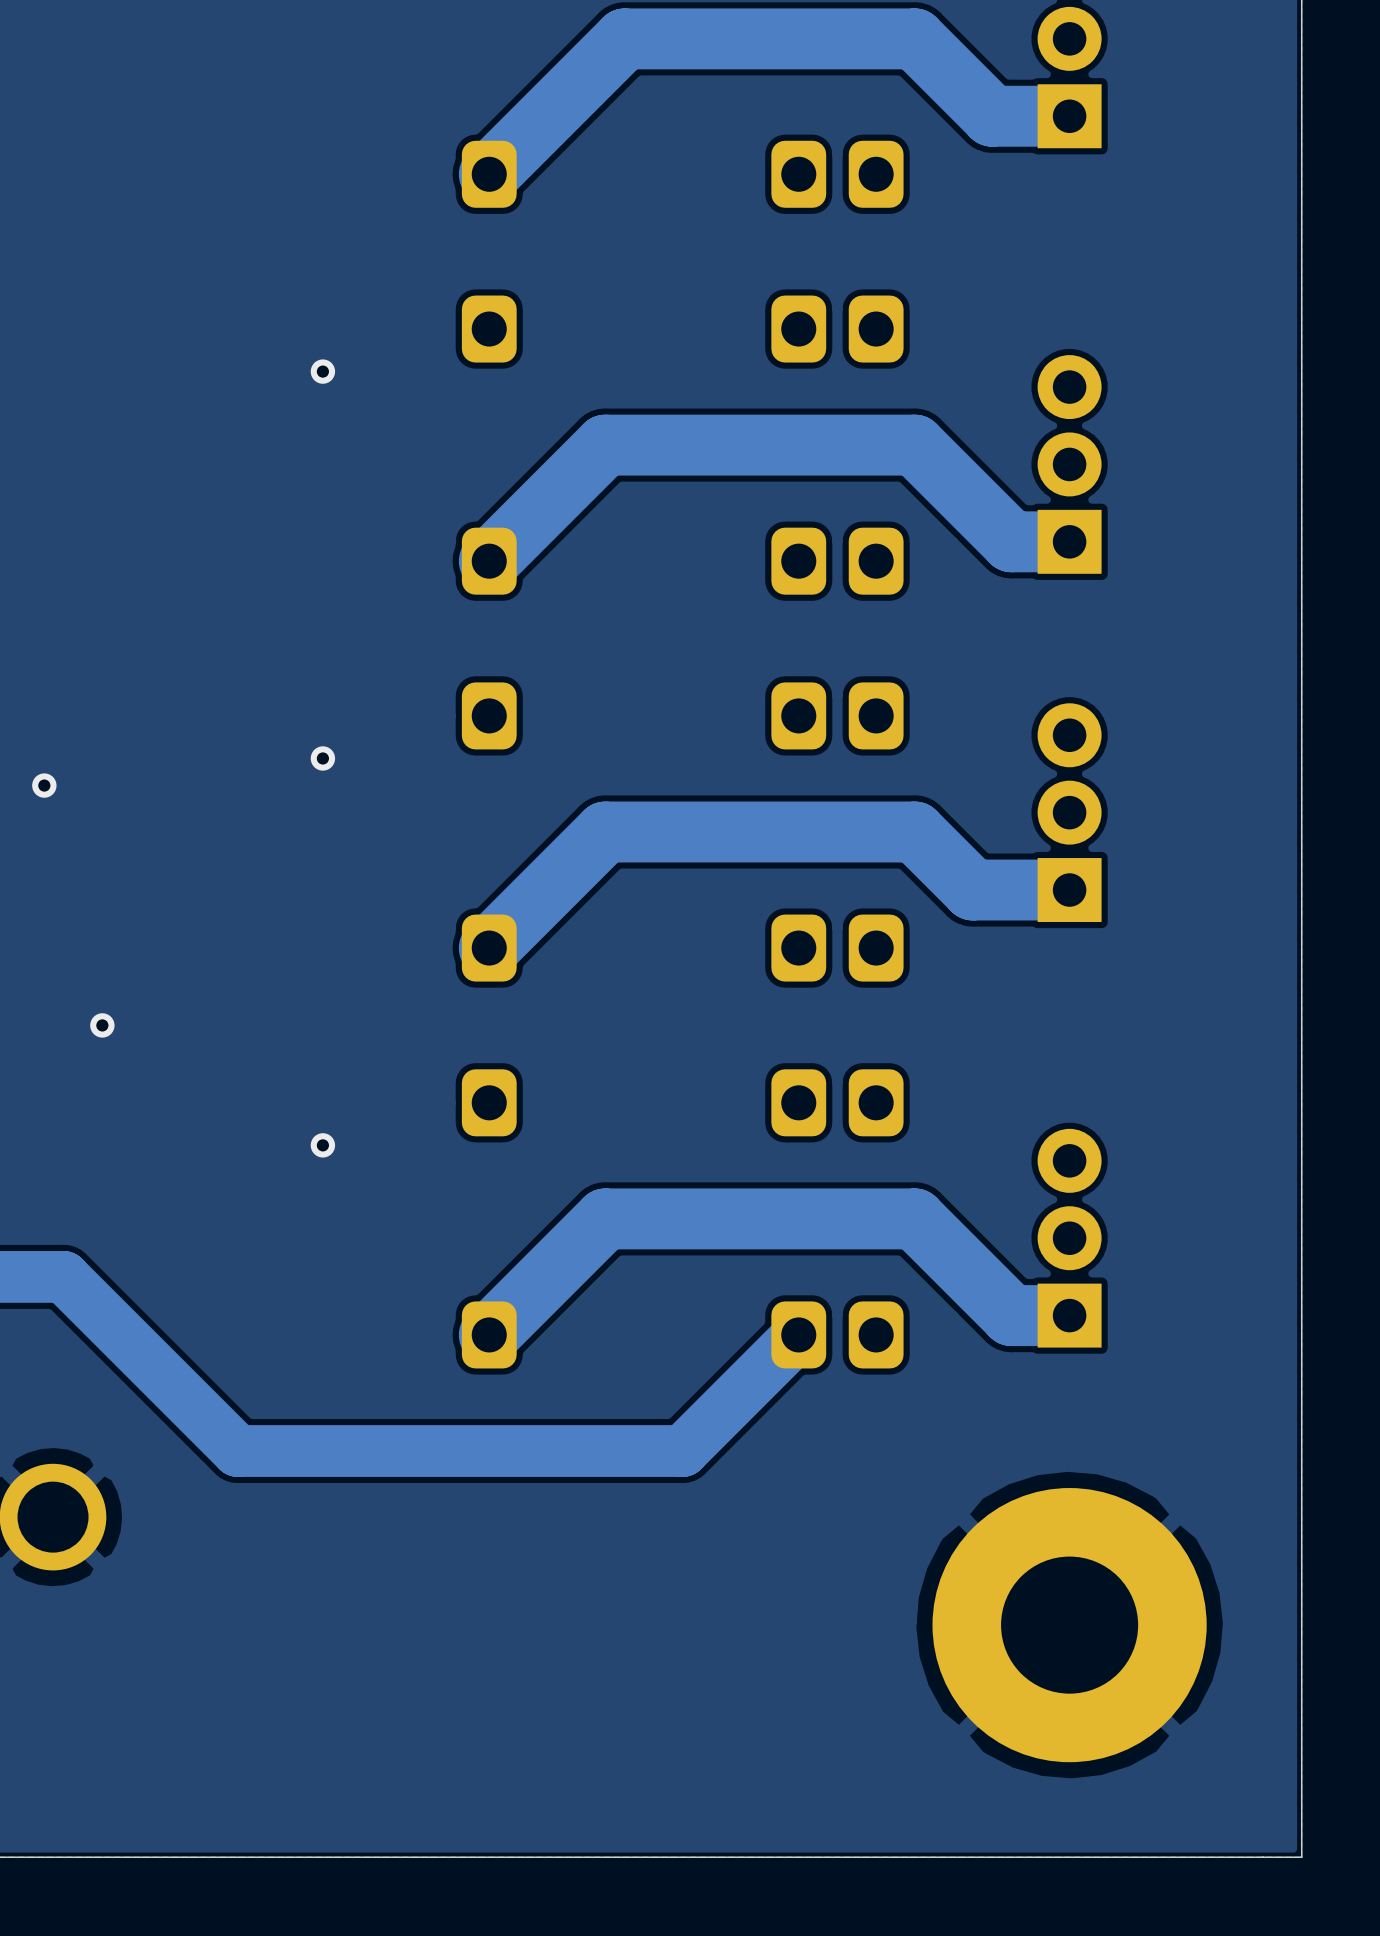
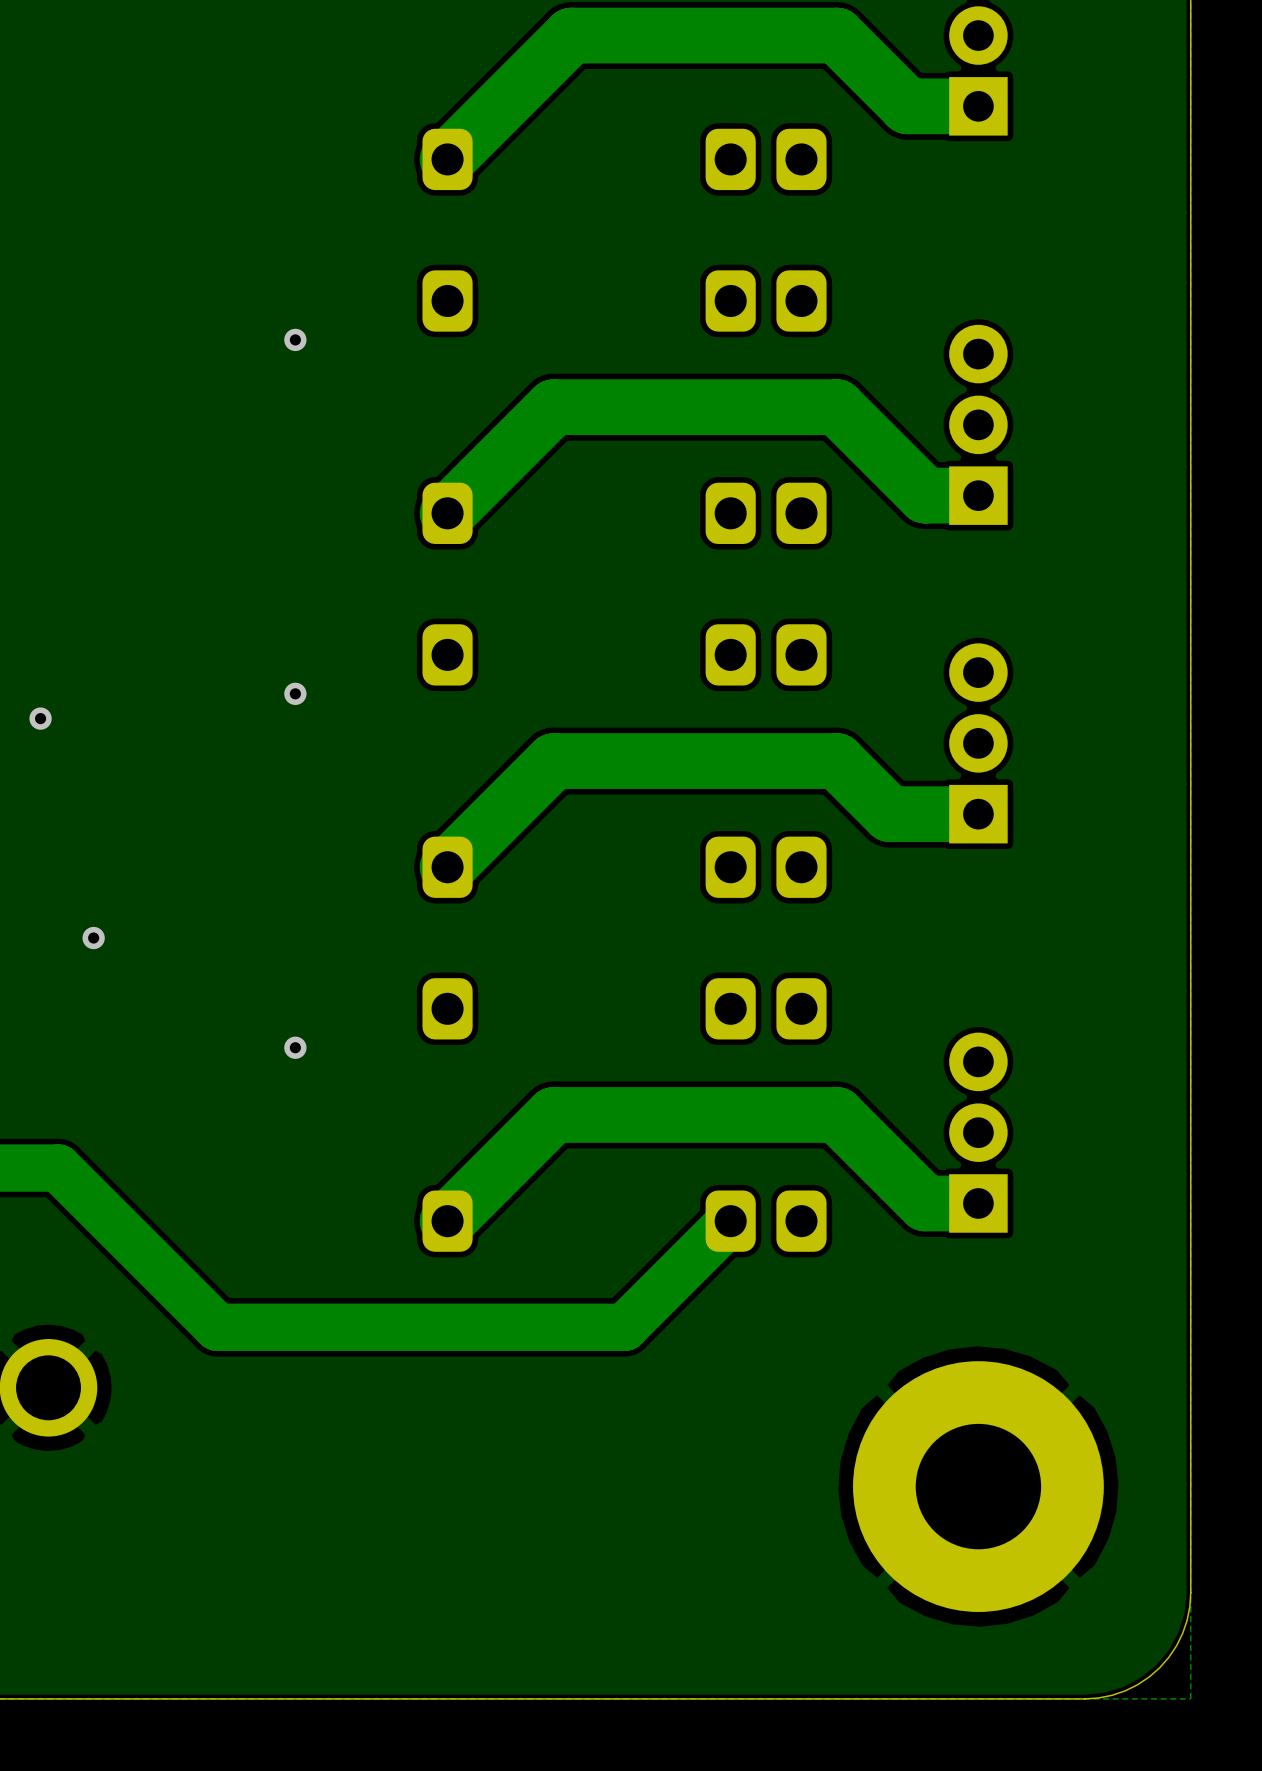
board edge: (1301, 1741) (1301, 1857) (1185, 1857) -> (1190, 1592) (1187, 1620) (1182, 1633) (1168, 1657) (1159, 1667) (1149, 1676) (1125, 1690) (1098, 1698) (1084, 1698)

